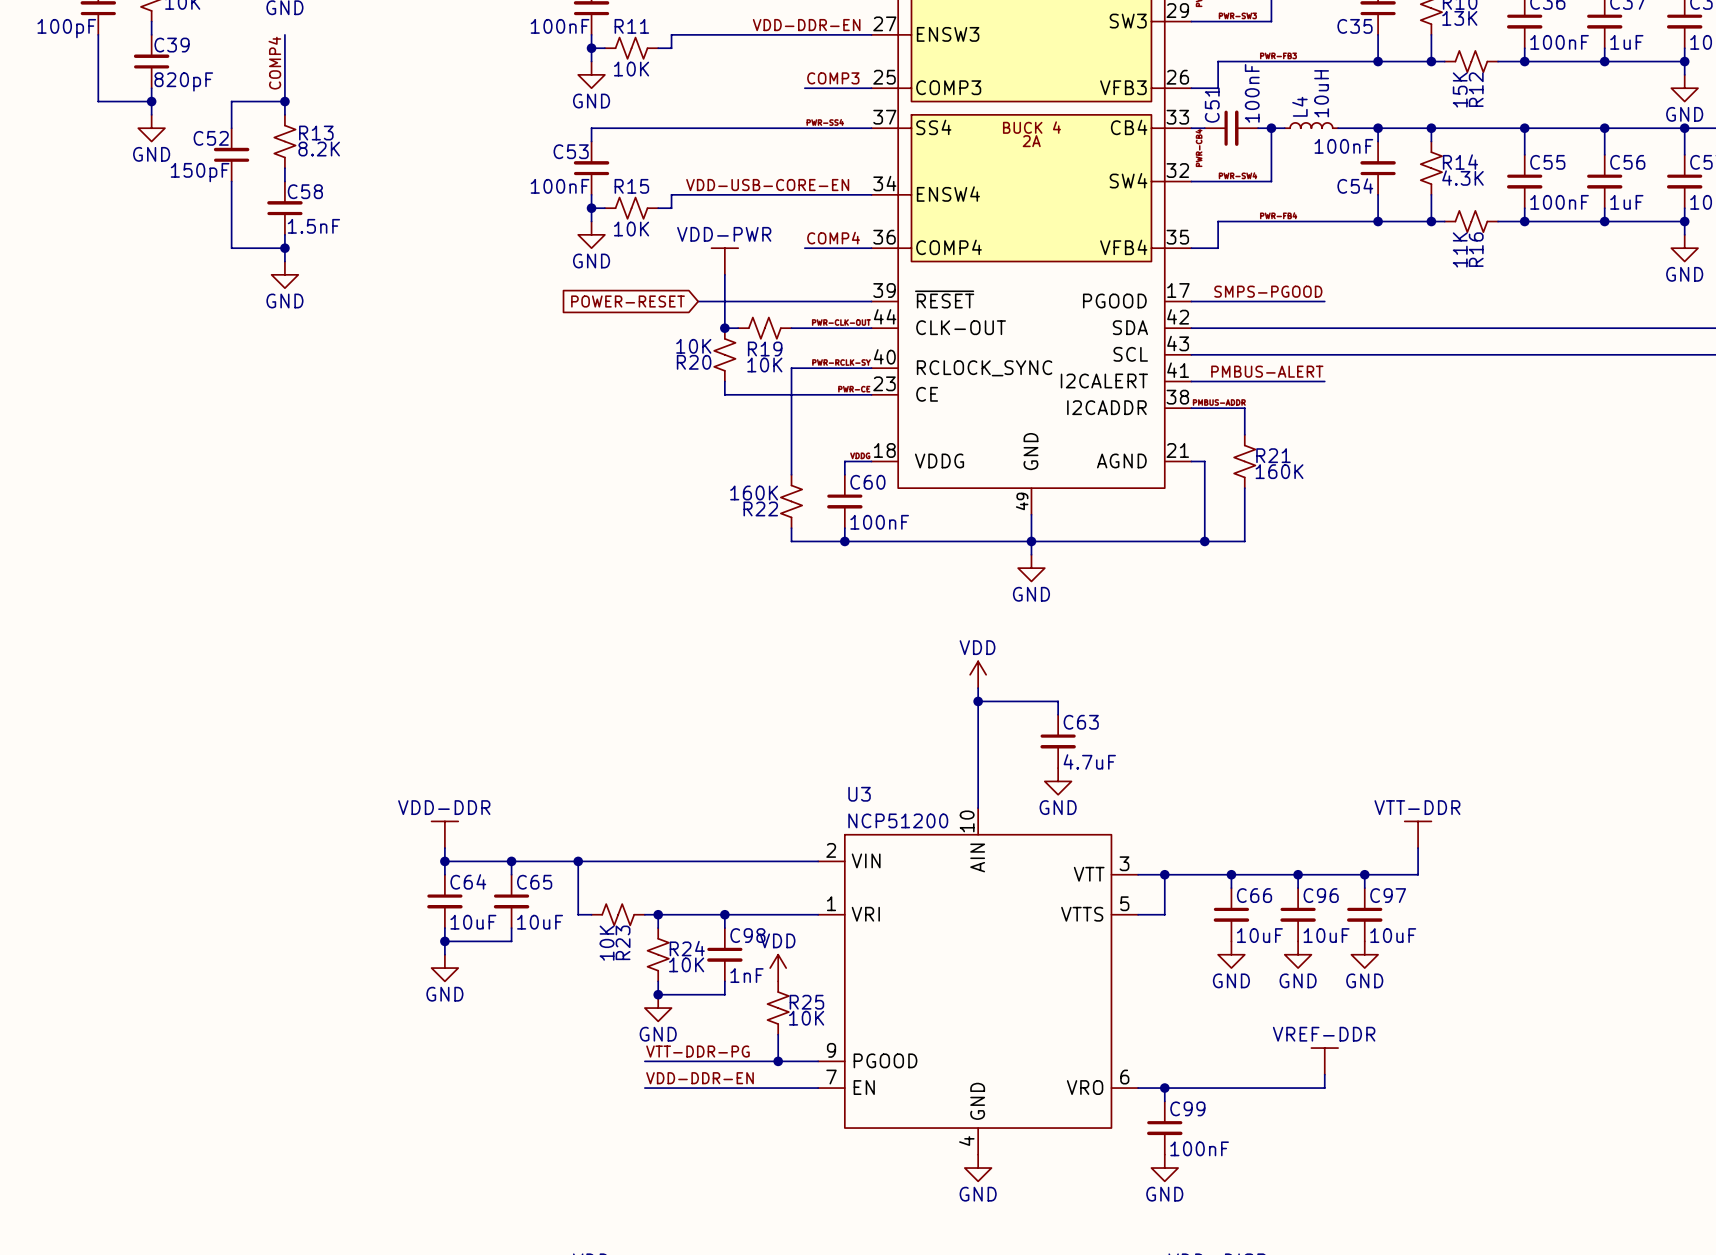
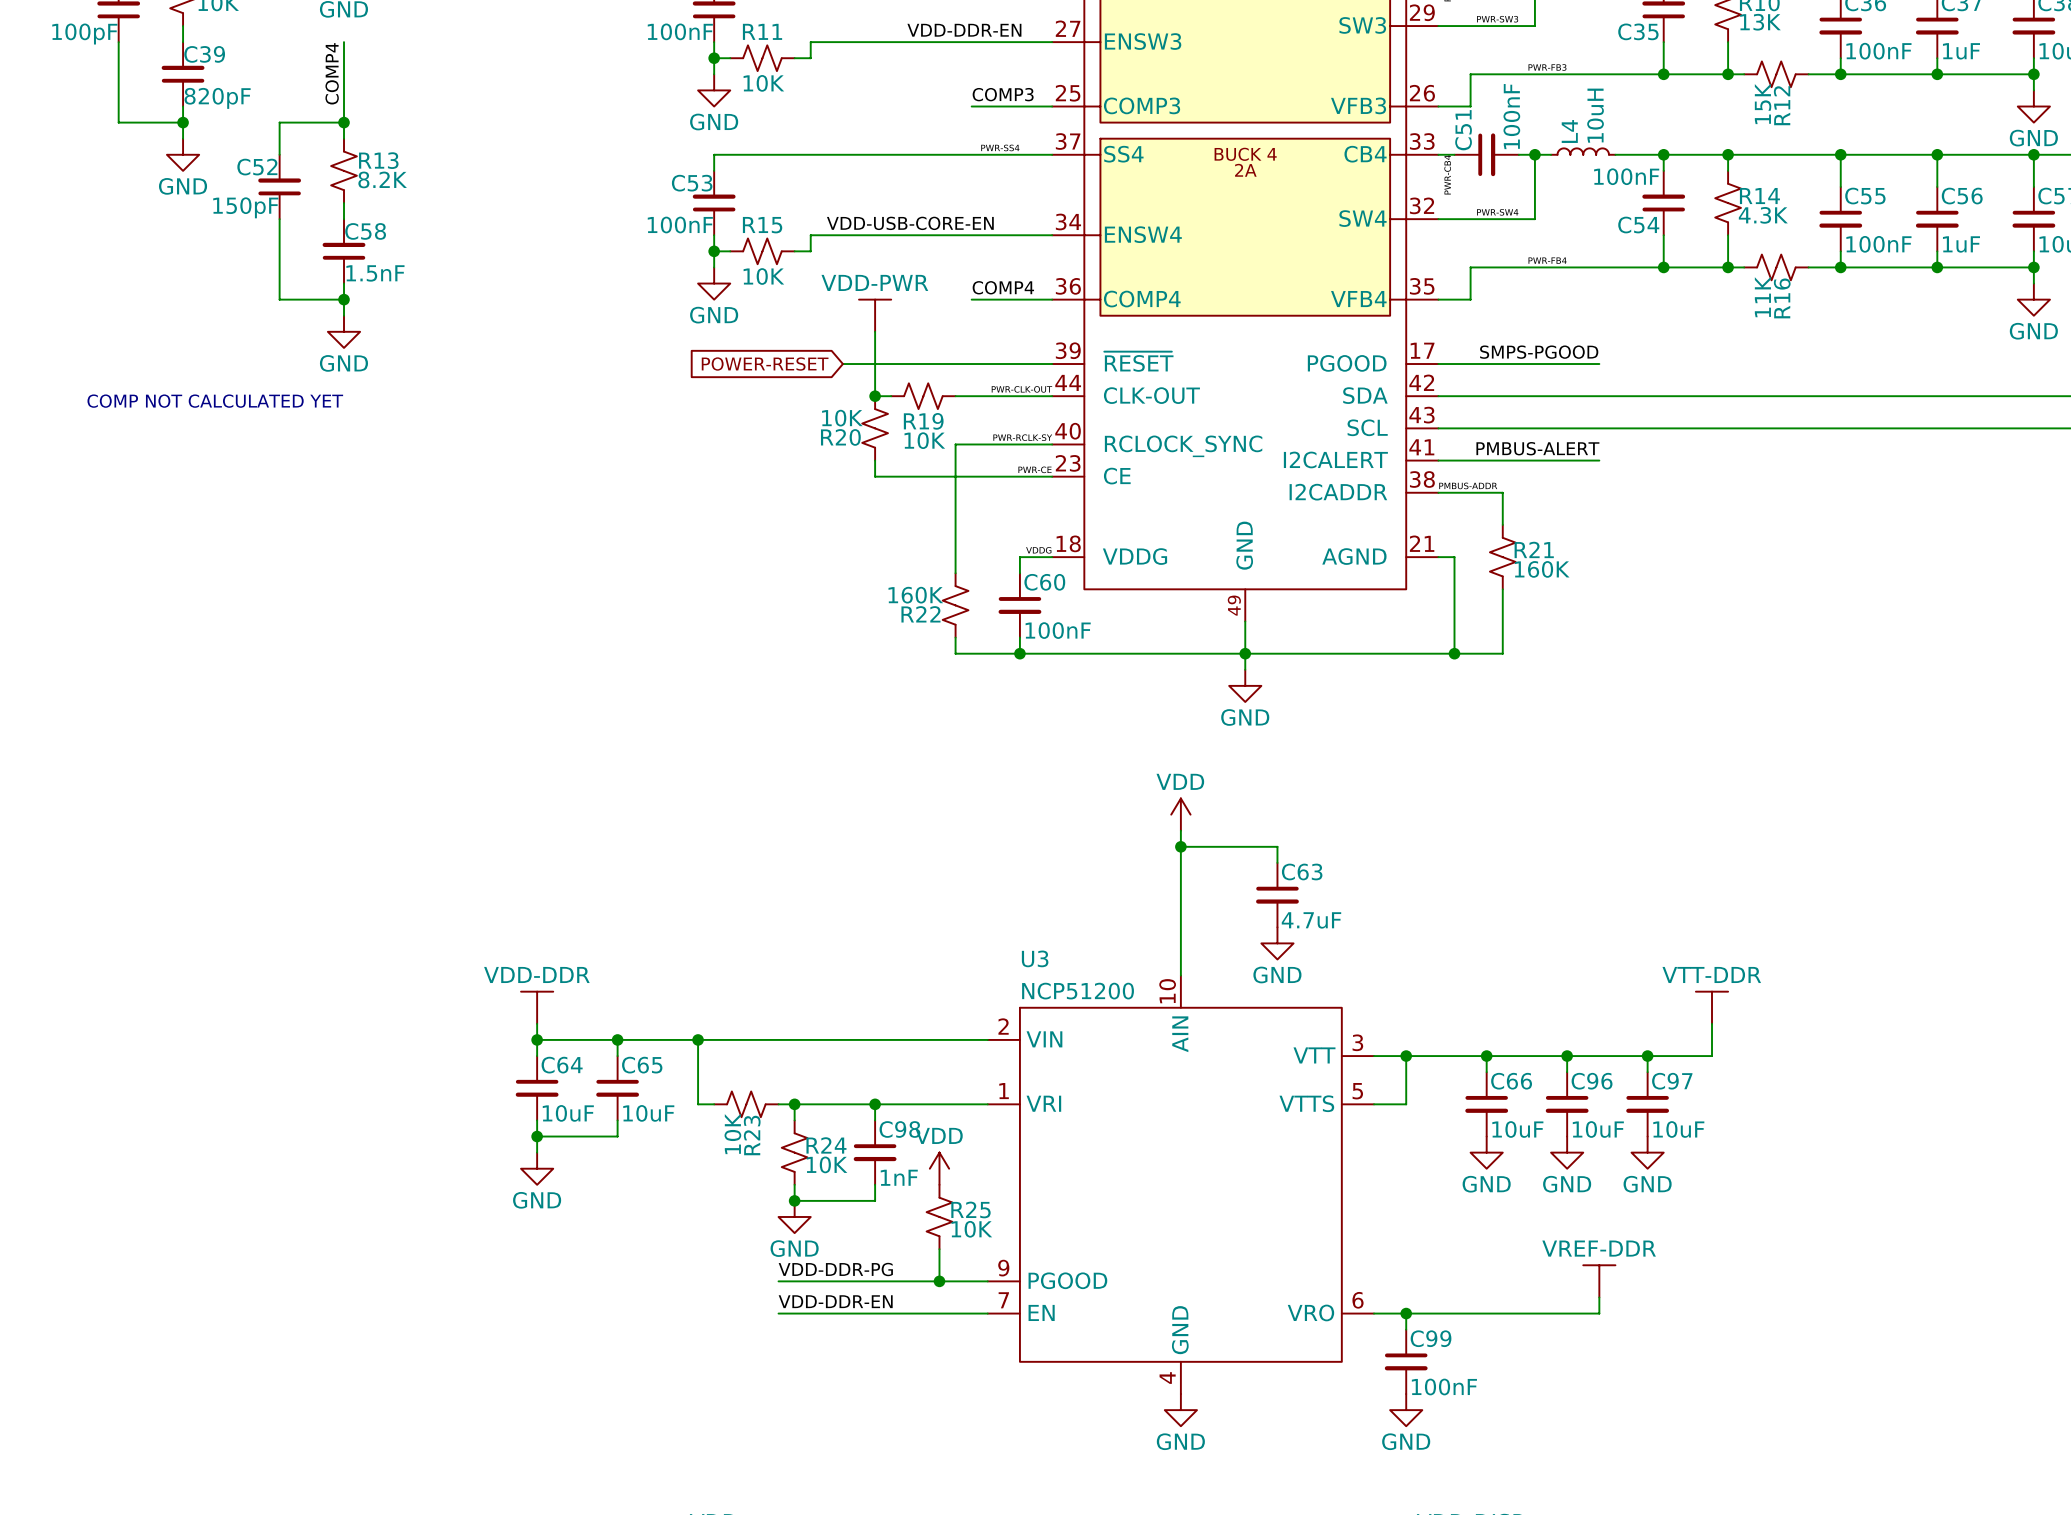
text: none -> COMP NOT CALCULATED YET (215, 401)
label: VTT-DDR-PG (697, 1051) -> VDD-DDR-PG (835, 1269)

